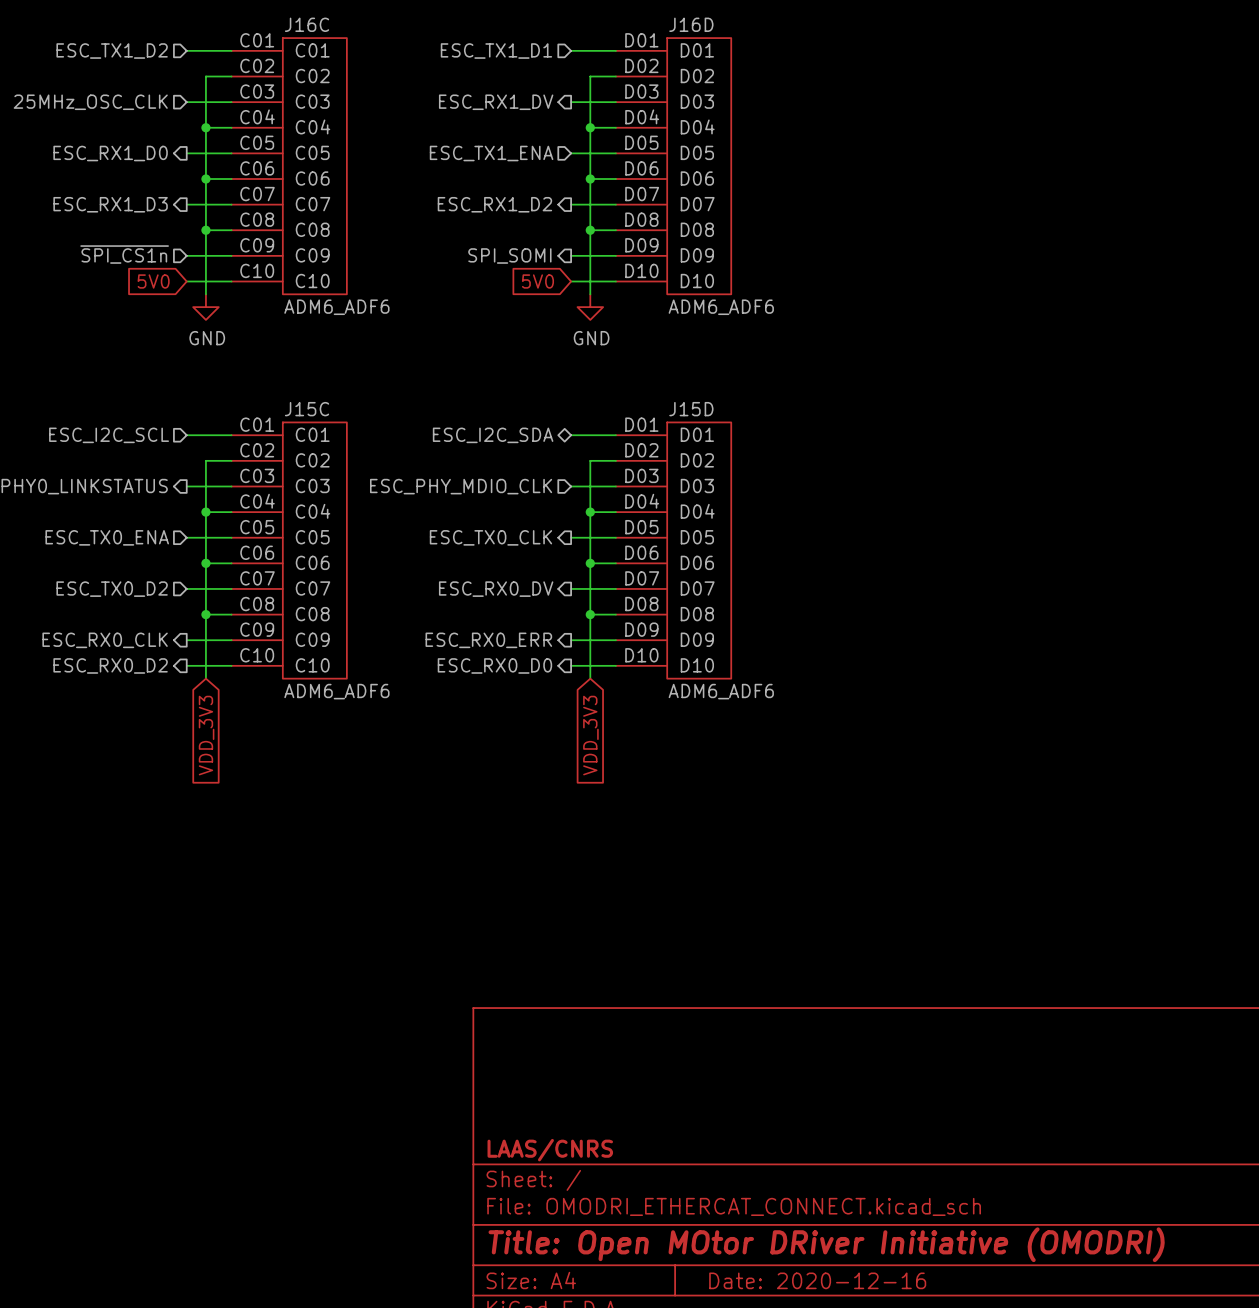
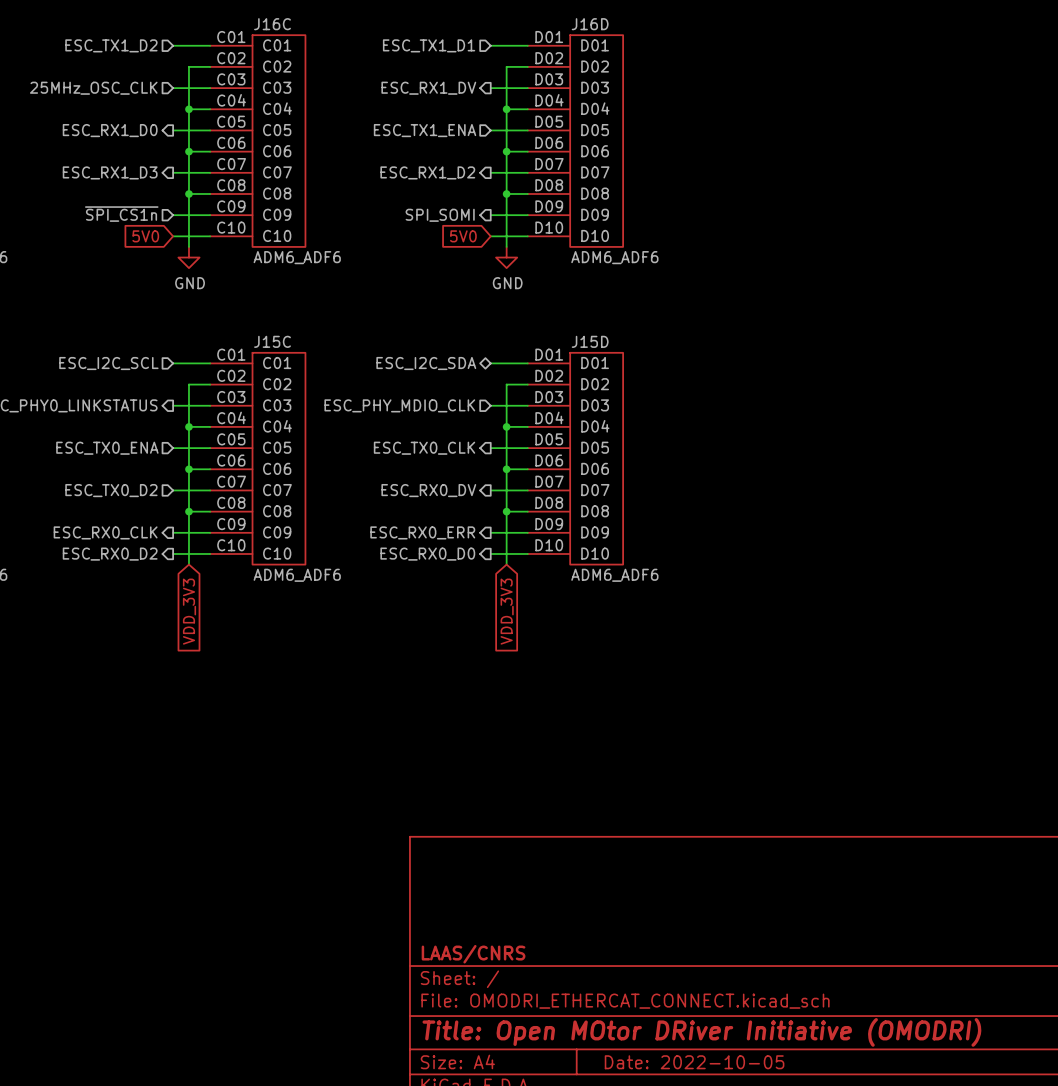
title block: Date: 2020-12-16 (817, 1280) -> Date: 2022-10-05 (694, 1062)

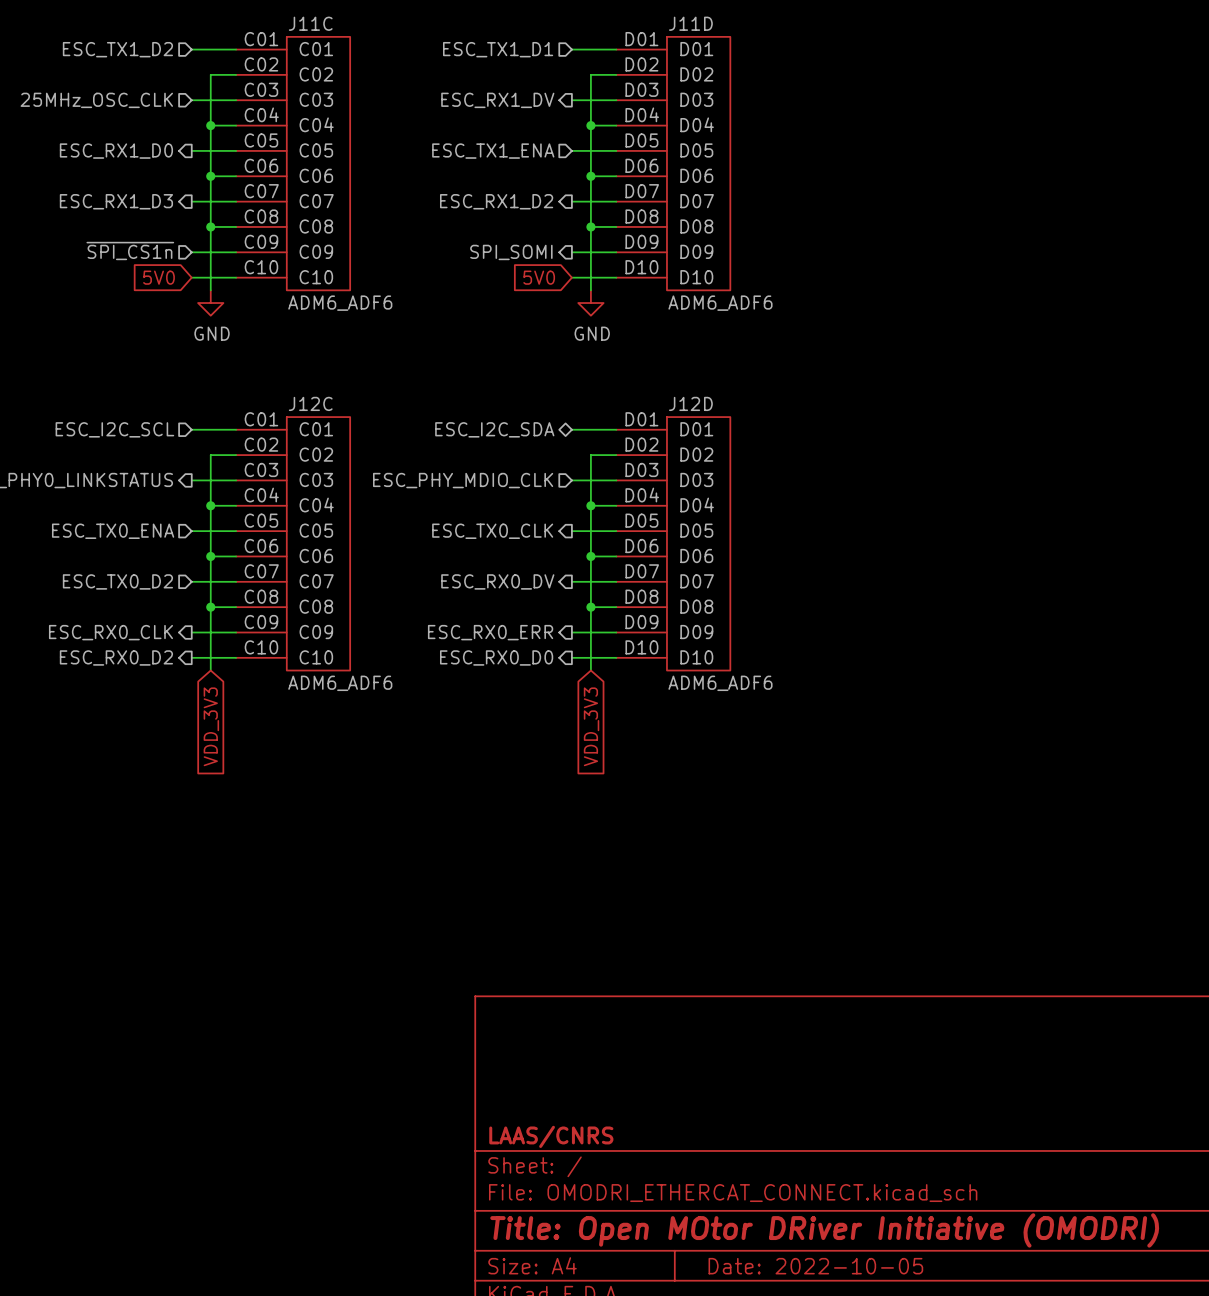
J16C name: J16C (272, 24) -> J11C (310, 23)
J16D name: J16D (590, 24) -> J11D (690, 23)
J15C name: J15C (272, 341) -> J12C (310, 403)
J15D name: J15D (590, 341) -> J12D (690, 403)

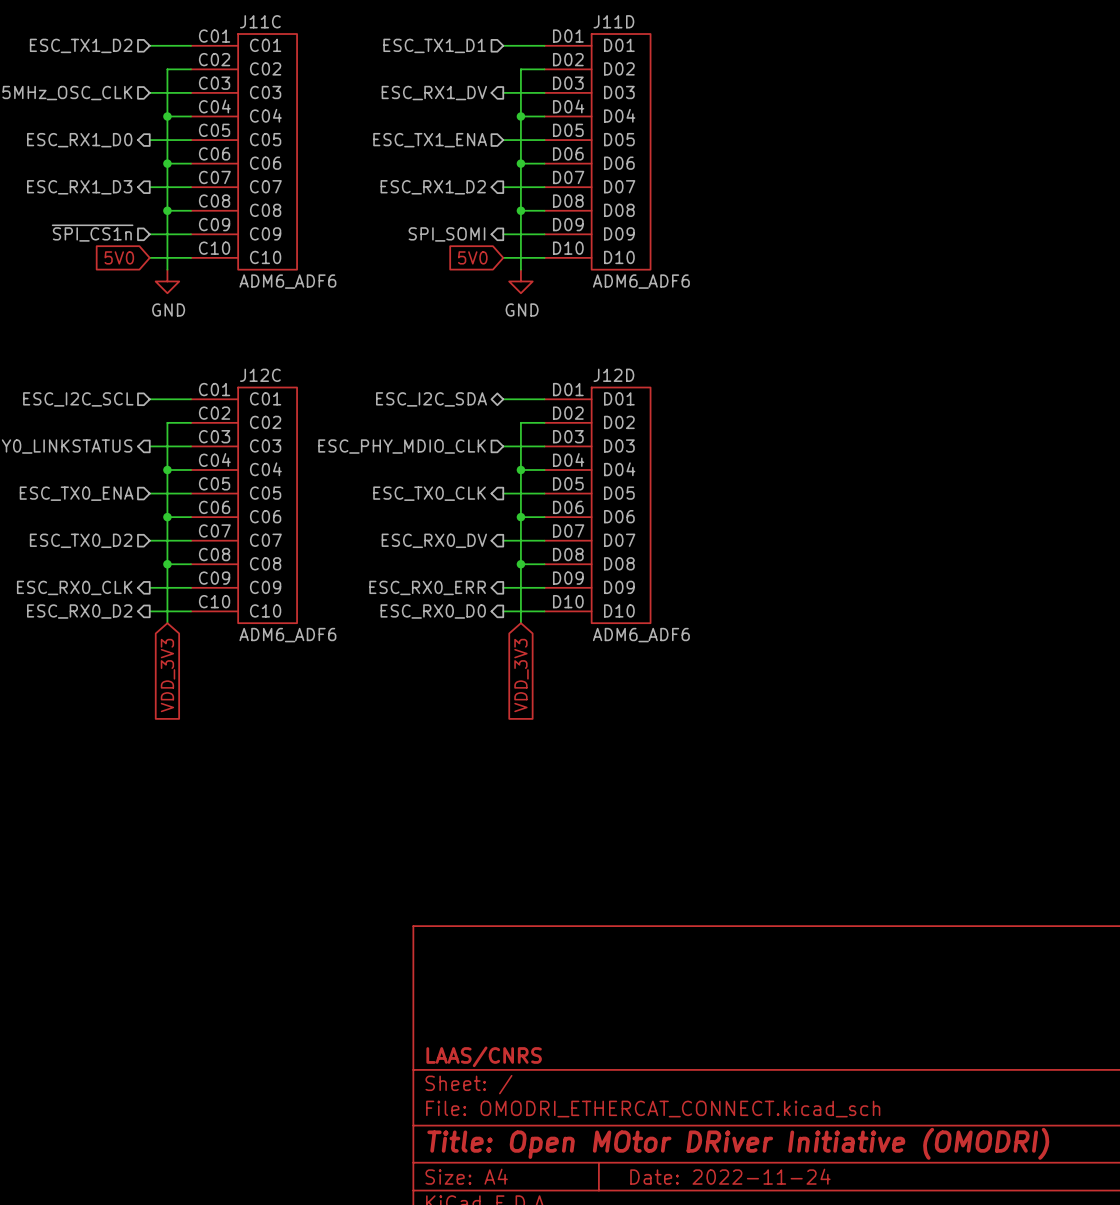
title block: Date: 2022-10-05 (815, 1266) -> Date: 2022-11-24 (730, 1176)

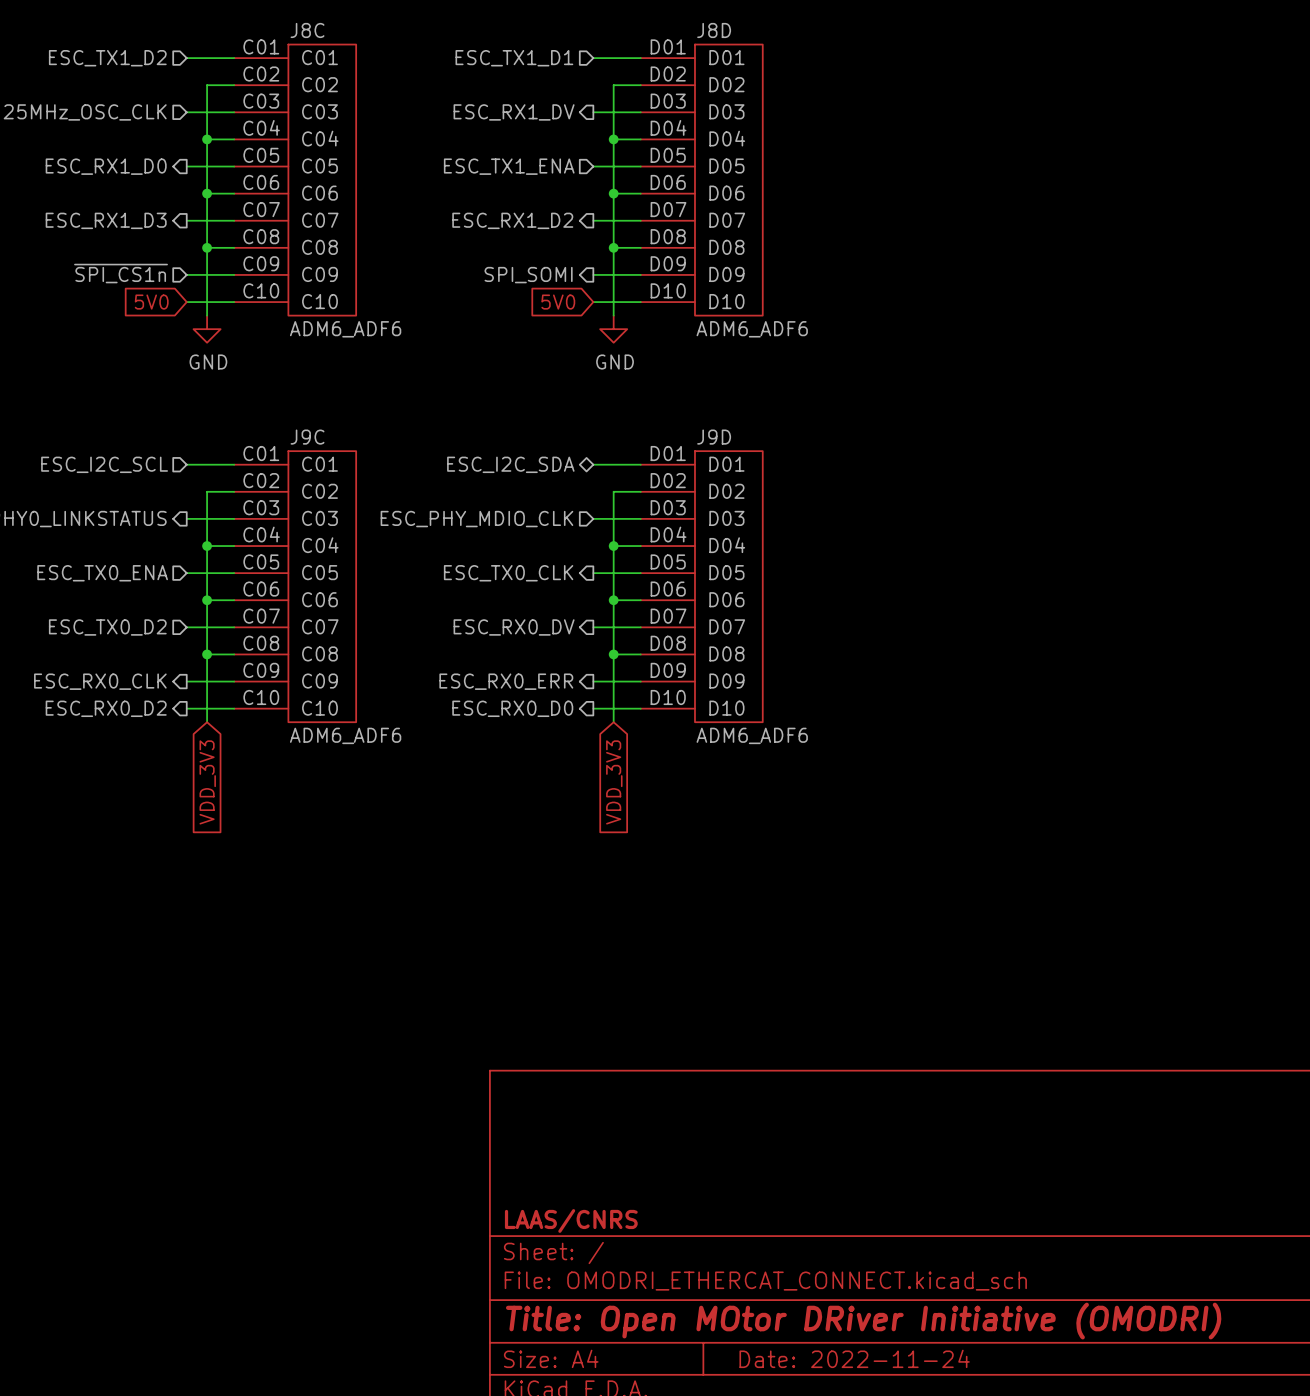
J11C name: J11C (260, 21) -> J8C (307, 30)
J11D name: J11D (613, 21) -> J8D (714, 30)
J12C name: J12C (260, 375) -> J9C (307, 437)
J12D name: J12D (613, 375) -> J9D (714, 437)

